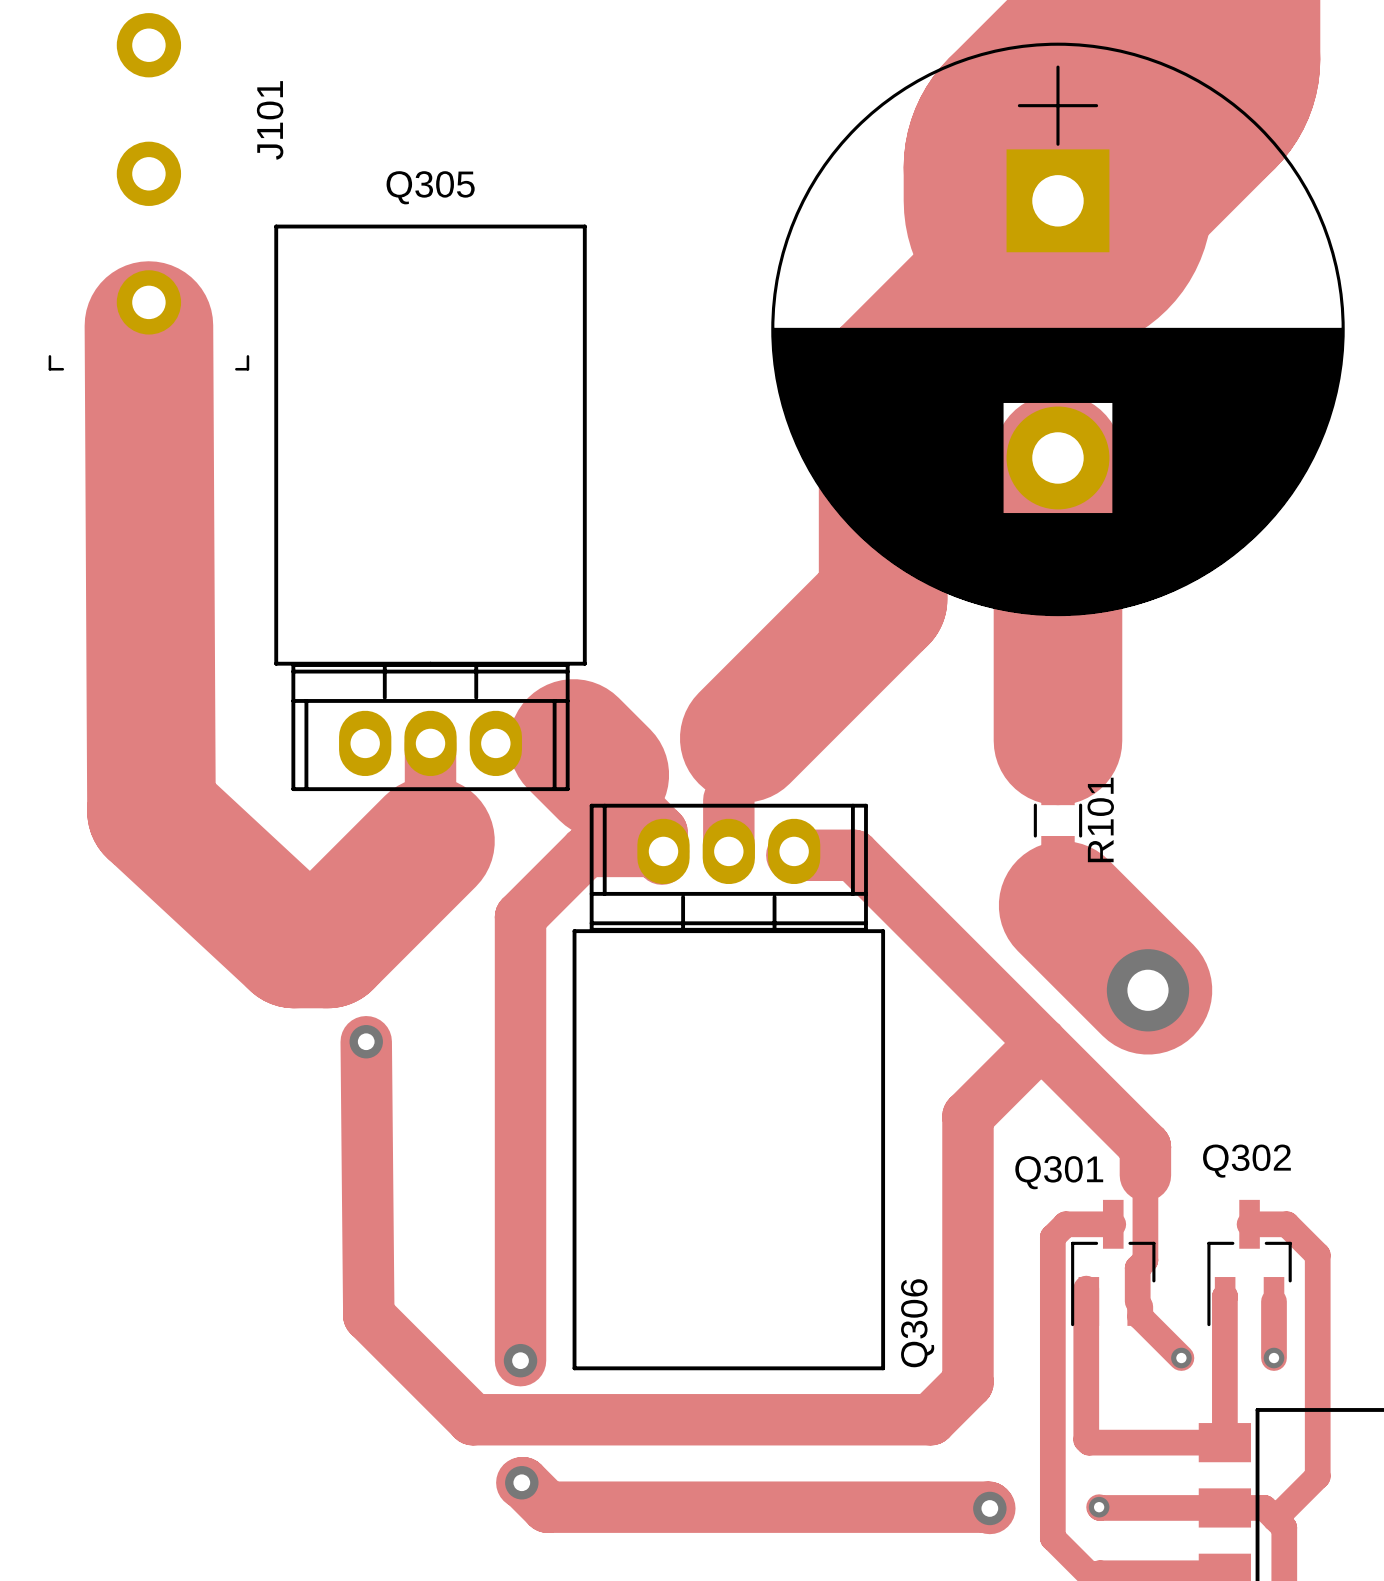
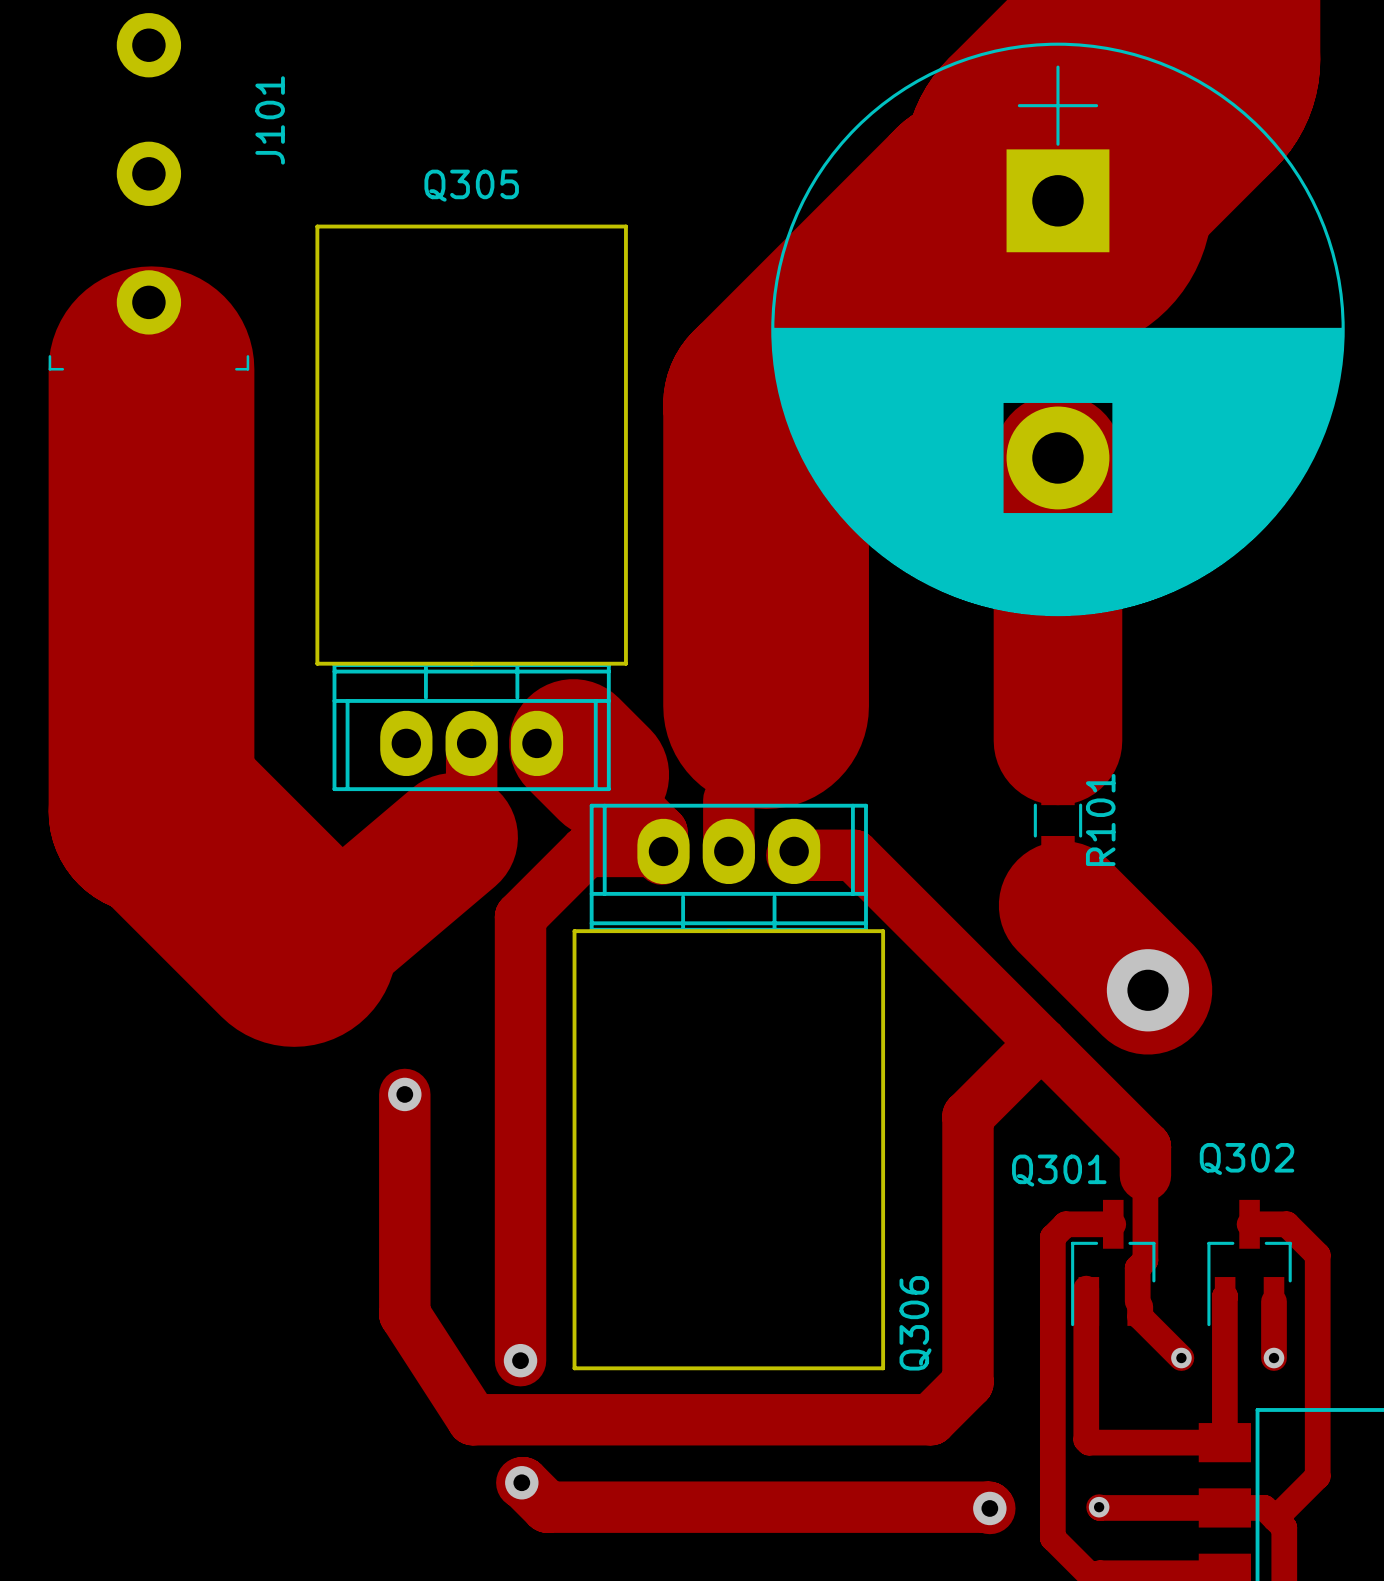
track: (1057, 200) (883, 375) (883, 599) (744, 738) -> (1057, 200) (969, 200) (766, 403) (766, 706)
track: (148, 325) (151, 811) (294, 944) -> (151, 369) (151, 811) (161, 811) (294, 944)
Q305 position: (430, 507) -> (471, 507)
track: (430, 743) (430, 789) -> none
track: (430, 841) (327, 944) -> (471, 743) (471, 819) (453, 837) (327, 944)
track: (366, 1041) (368, 1315) (472, 1419) -> (404, 1094) (404, 1314) (472, 1419)
via position: (366, 1041) -> (404, 1094)

